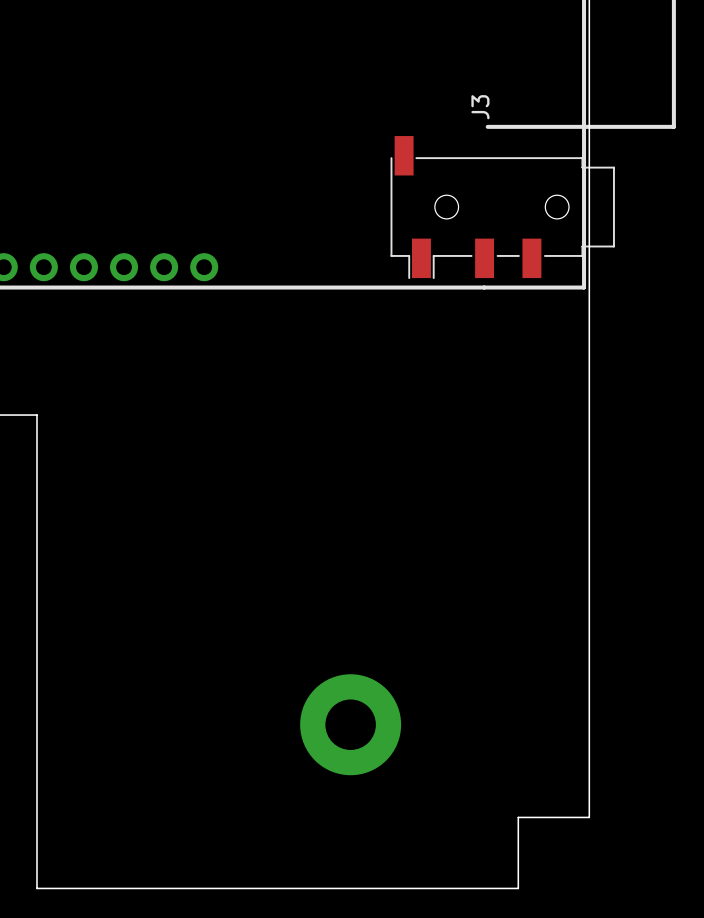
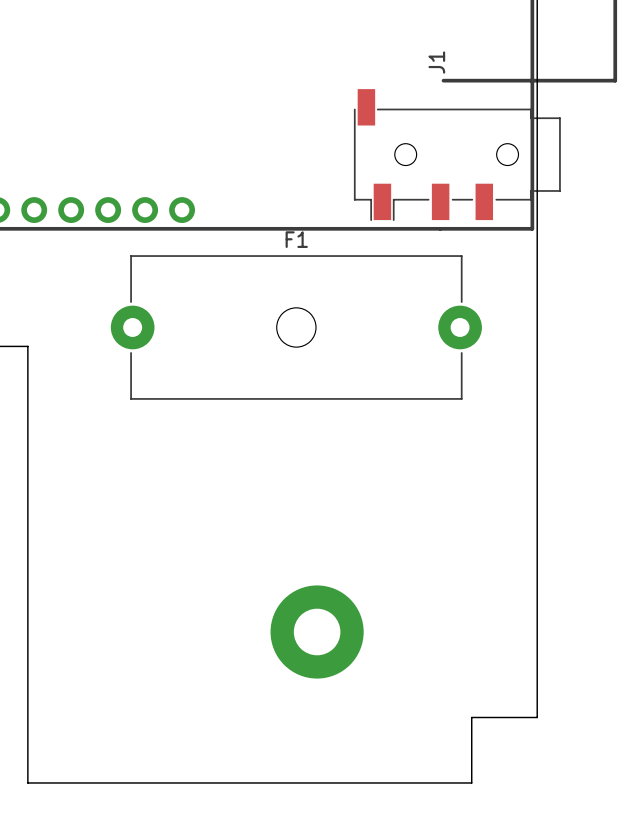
J3 name: J3 (480, 107) -> J1 (436, 62)
F1: none -> (296, 327)

